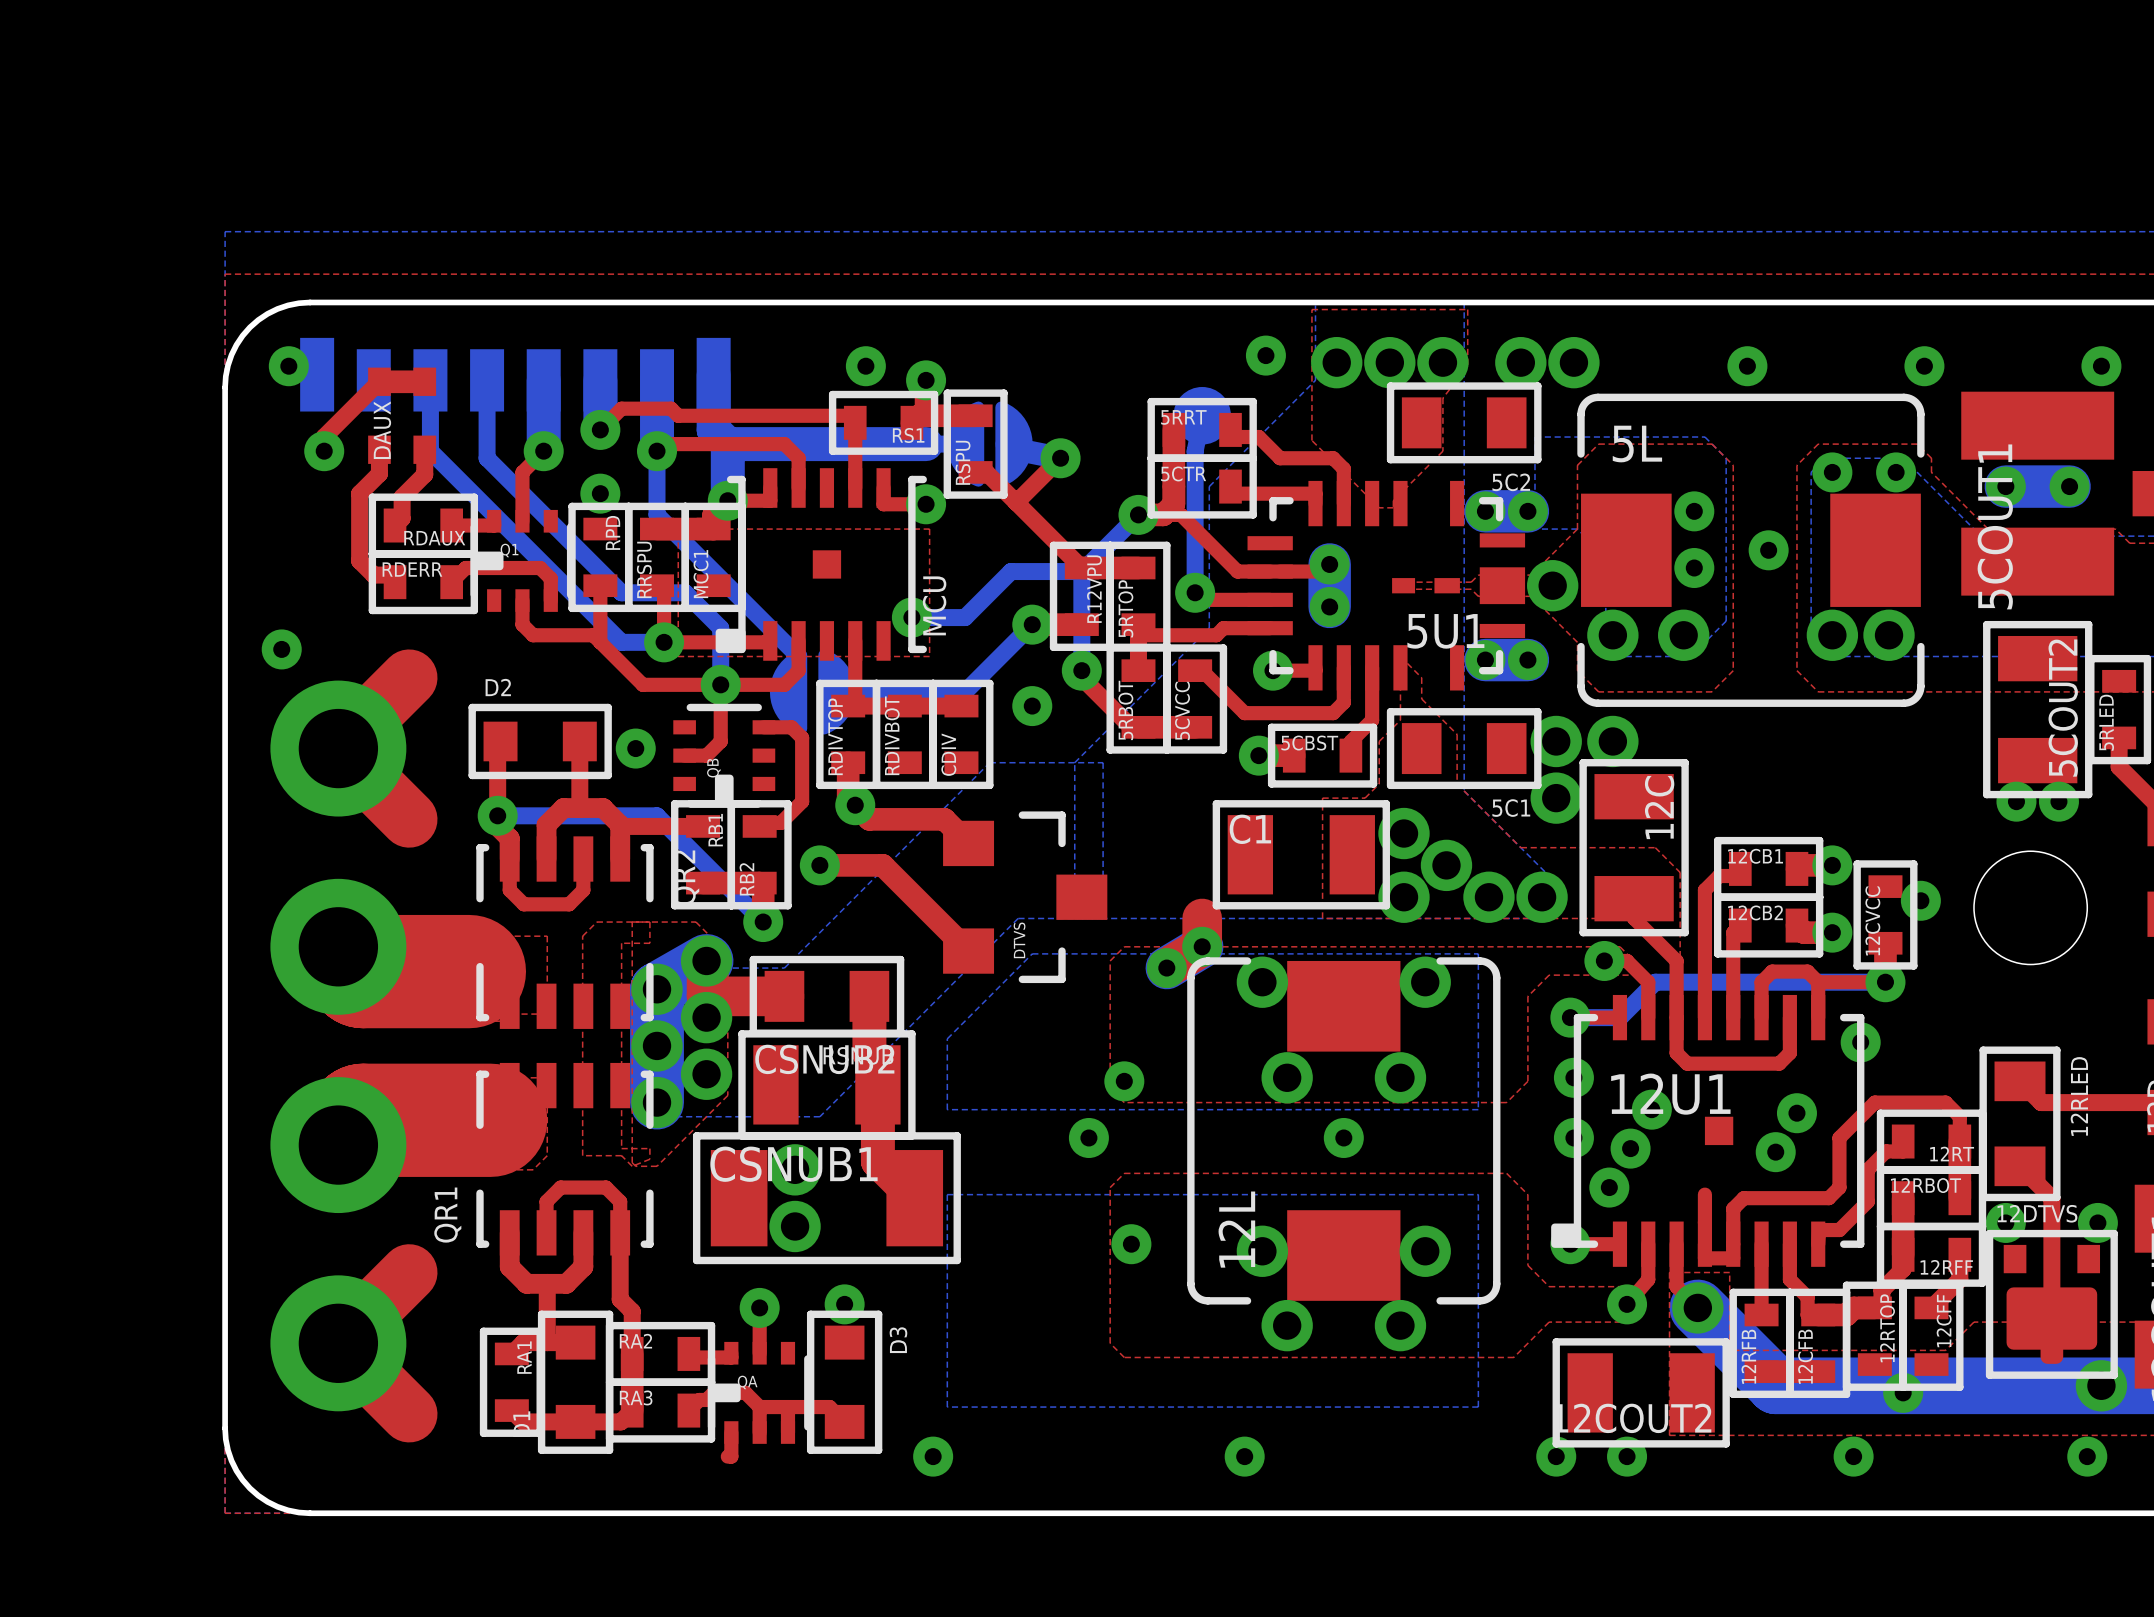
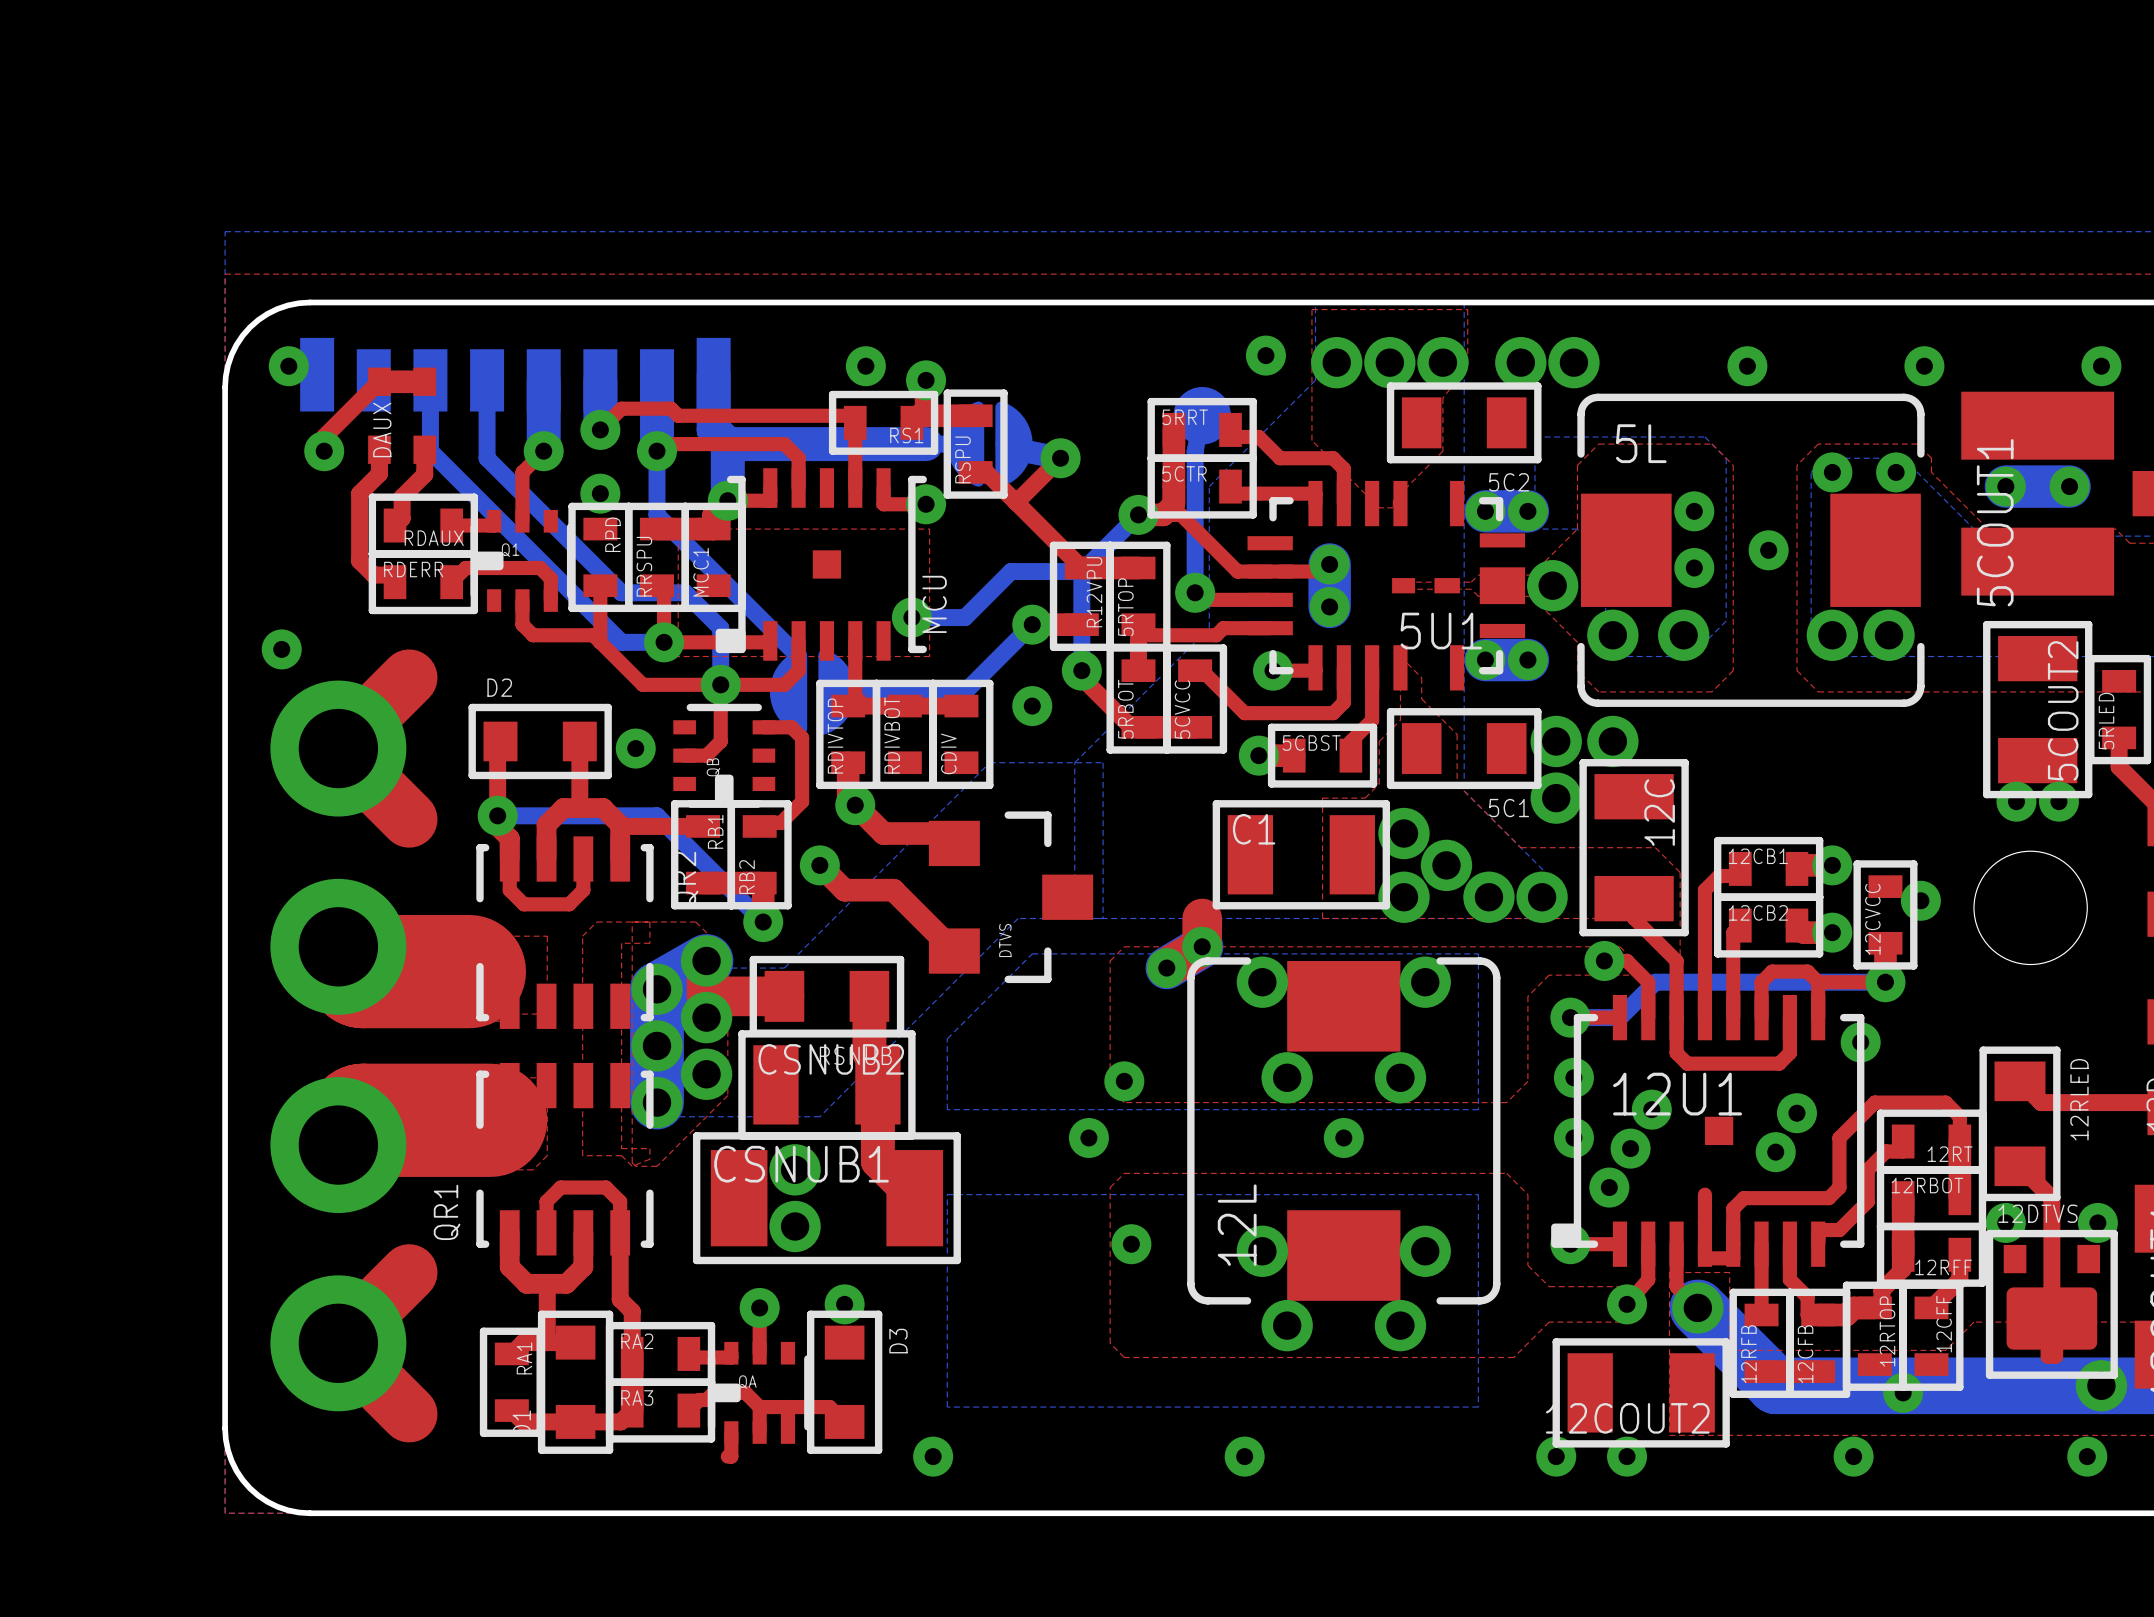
top track: (869, 819) (944, 819) (968, 843) -> (869, 819) (883, 833) (944, 833) (954, 843)
top track: (819, 865) (882, 865) (968, 951) -> (819, 865) (844, 890) (893, 890) (954, 951)
DTVS position: (1025, 897) -> (1011, 897)

